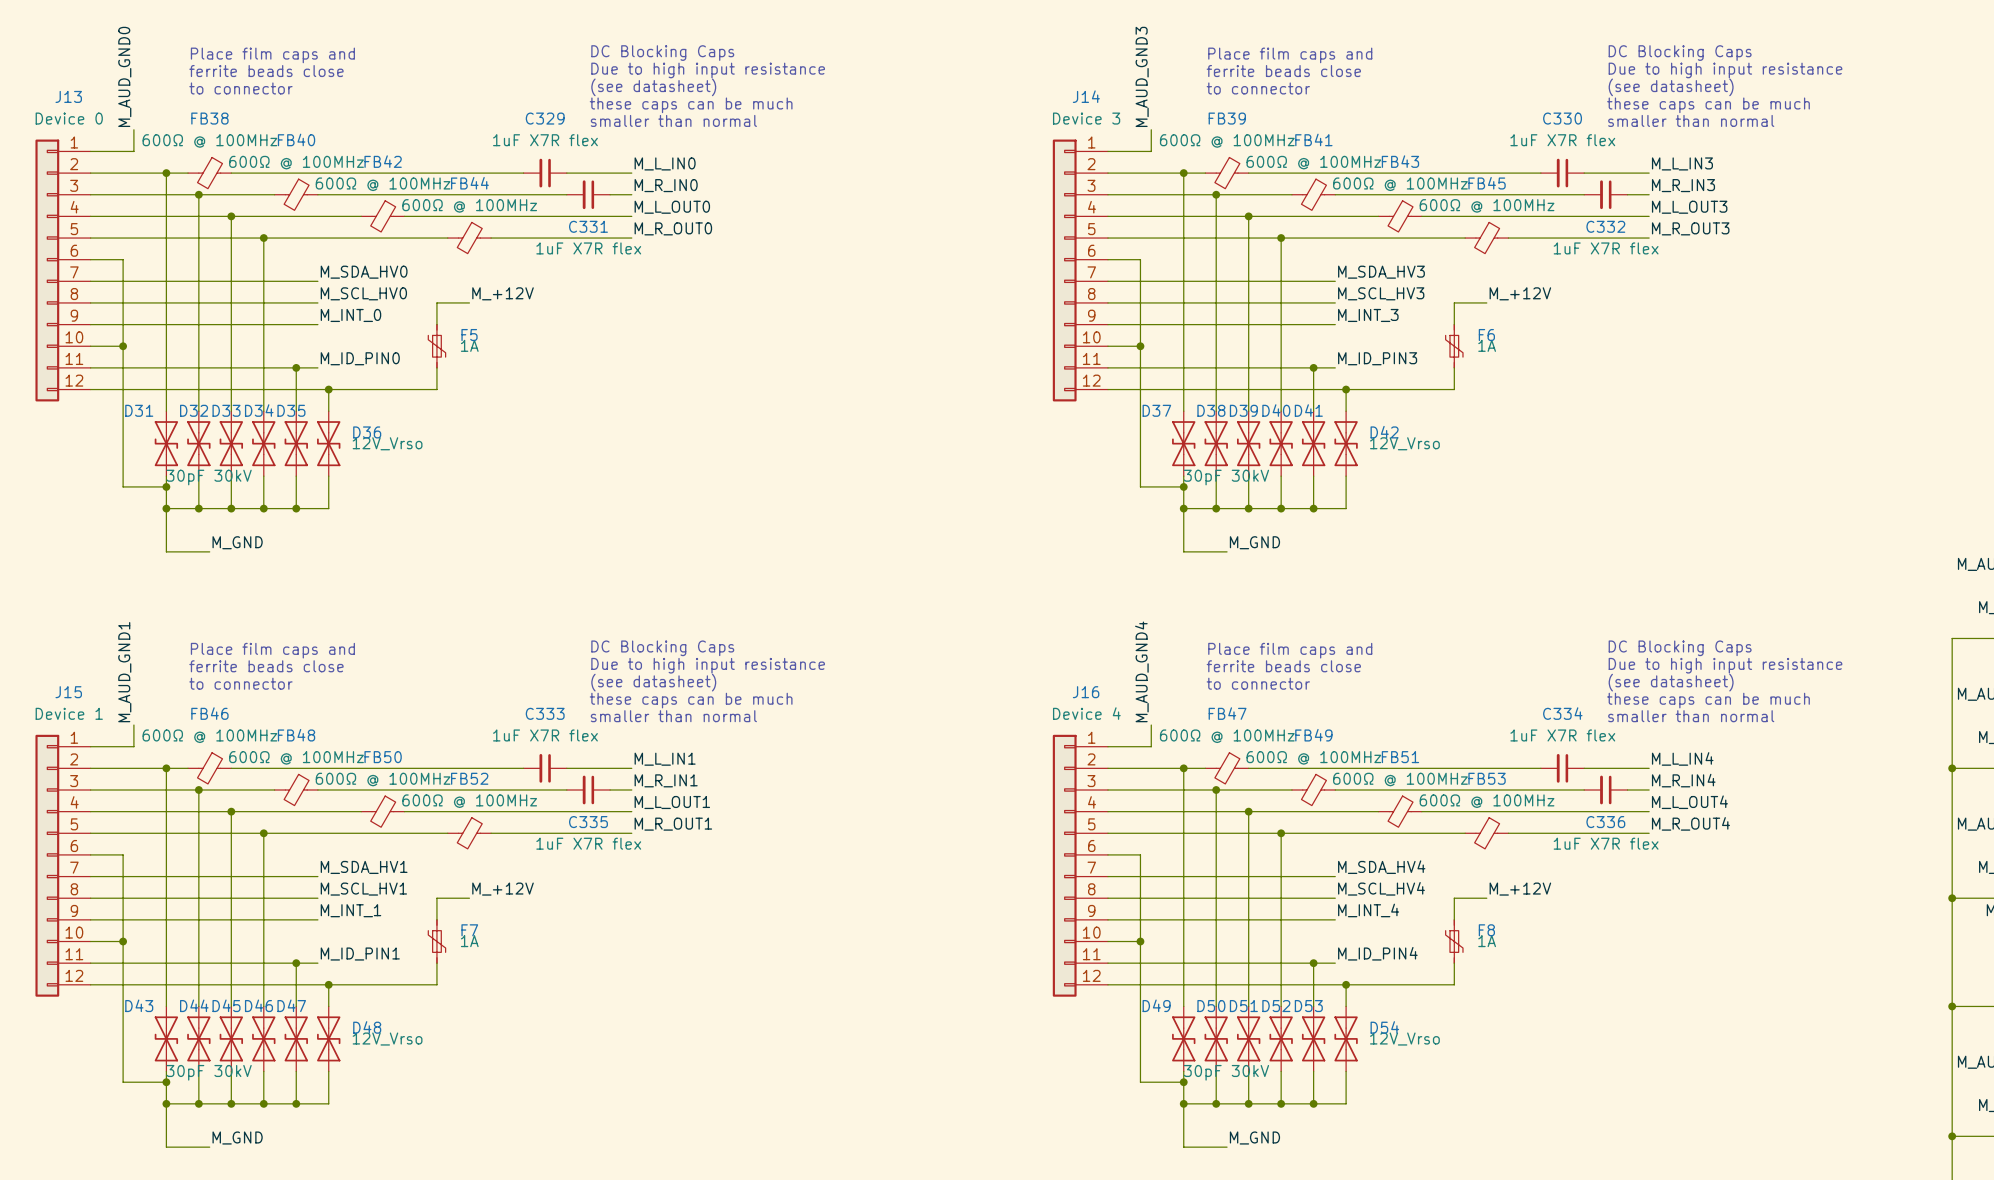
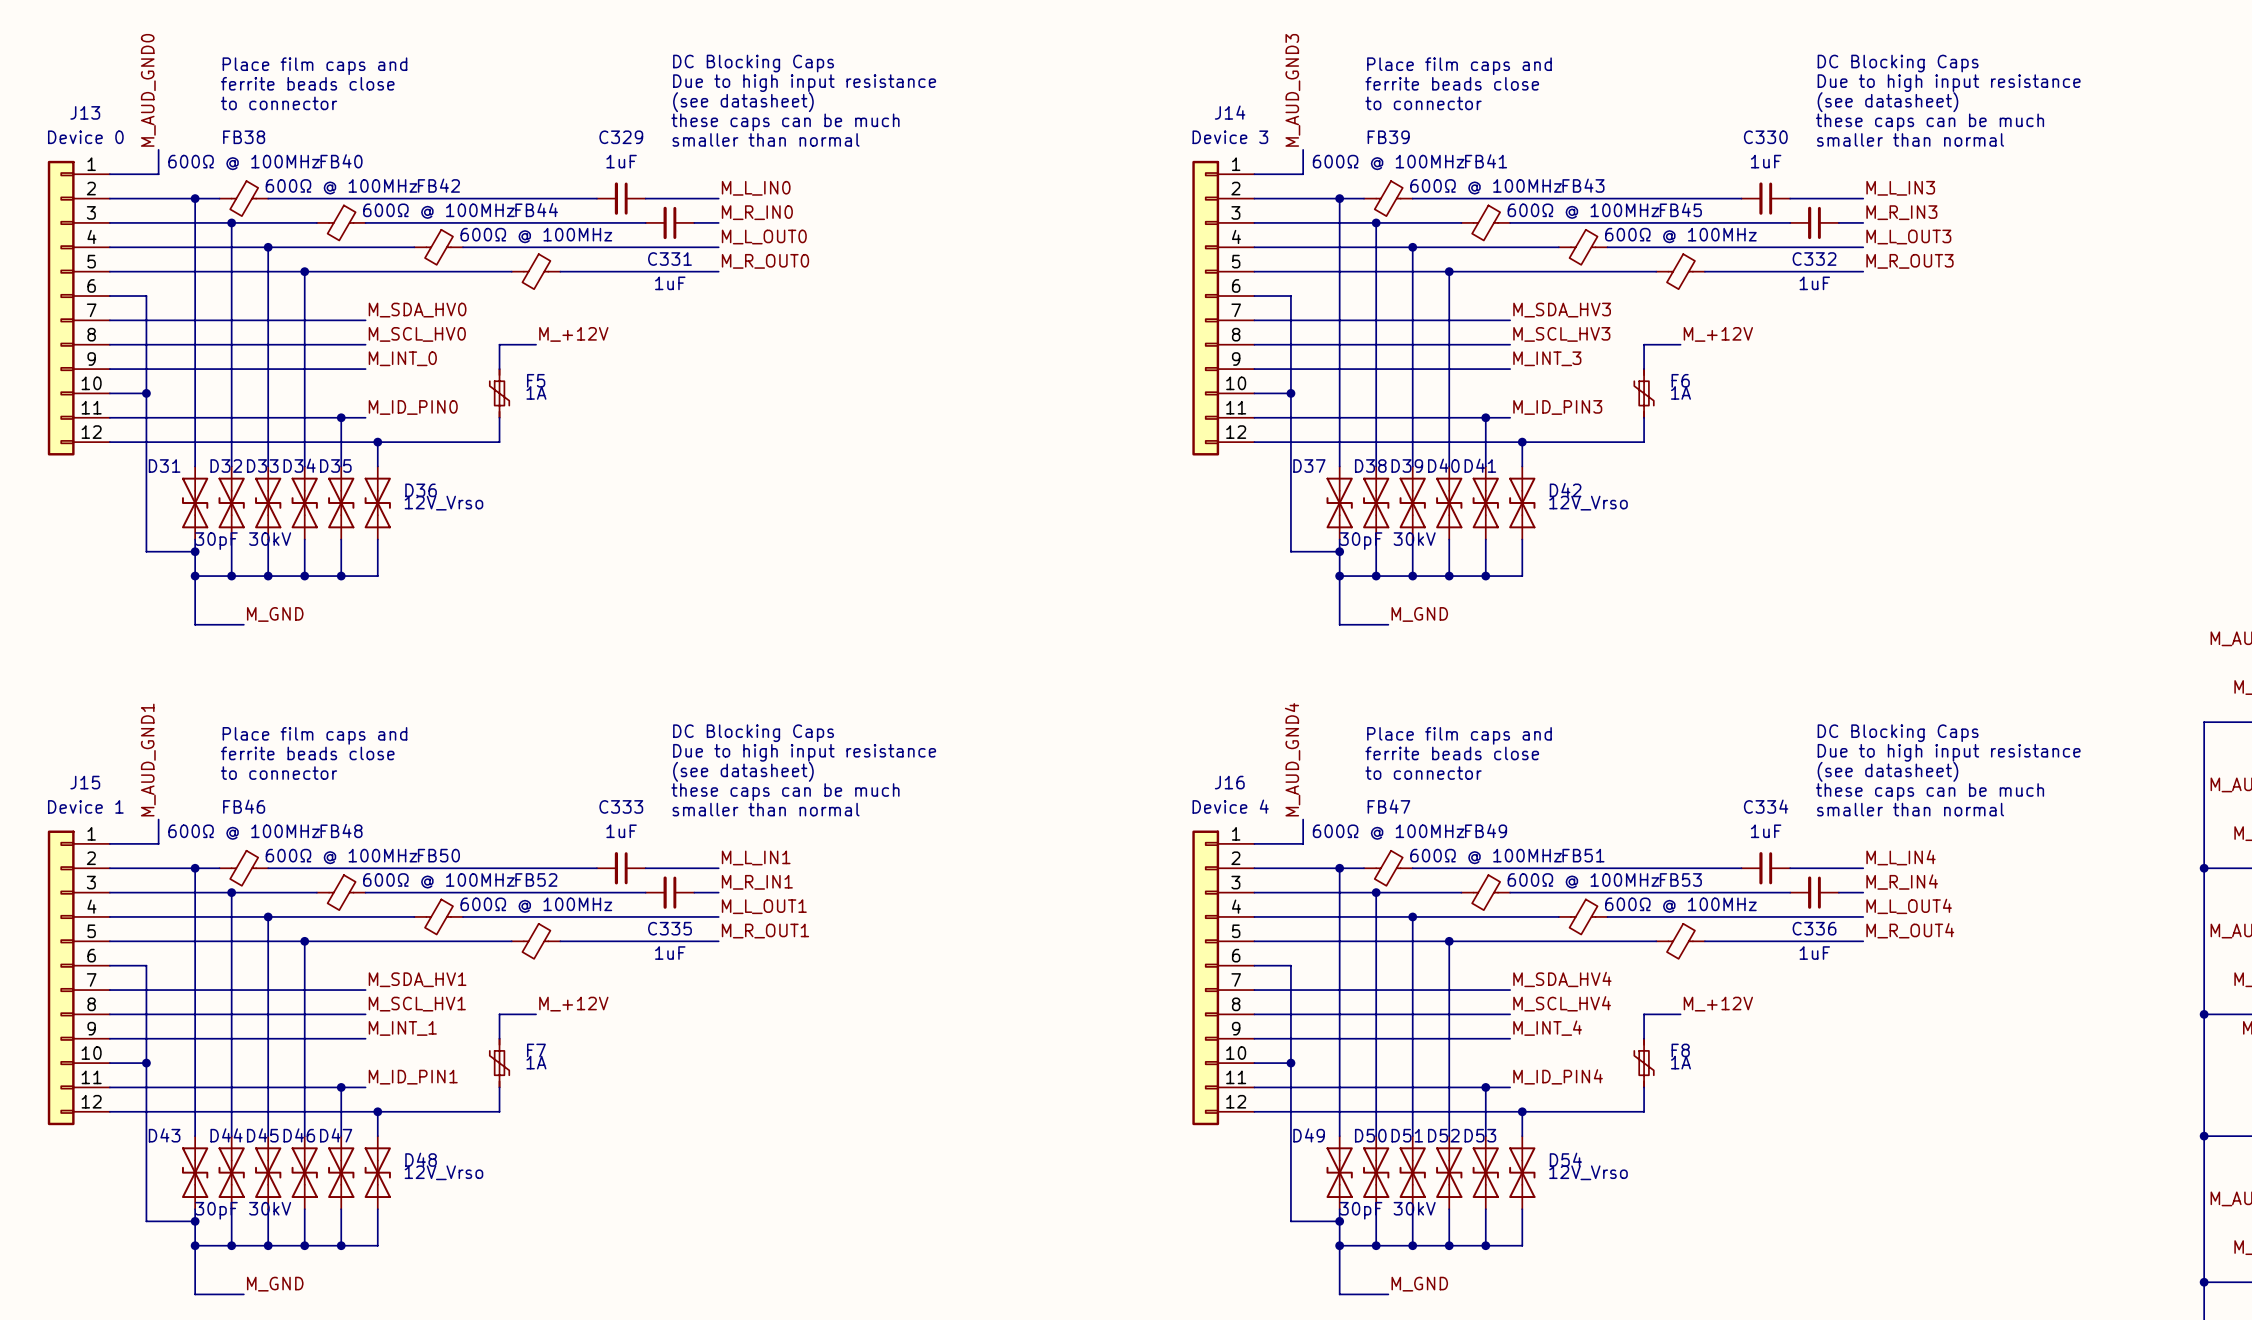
C329 value: 1uF X7R flex (545, 140) -> 1uF (621, 161)
C330 value: 1uF X7R flex (1562, 140) -> 1uF (1766, 161)
C331 value: 1uF X7R flex (588, 248) -> 1uF (670, 283)
C332 value: 1uF X7R flex (1606, 248) -> 1uF (1814, 283)
C333 value: 1uF X7R flex (545, 735) -> 1uF (621, 831)
C334 value: 1uF X7R flex (1562, 735) -> 1uF (1766, 831)
C335 value: 1uF X7R flex (588, 843) -> 1uF (670, 953)
C336 value: 1uF X7R flex (1606, 843) -> 1uF (1814, 953)

